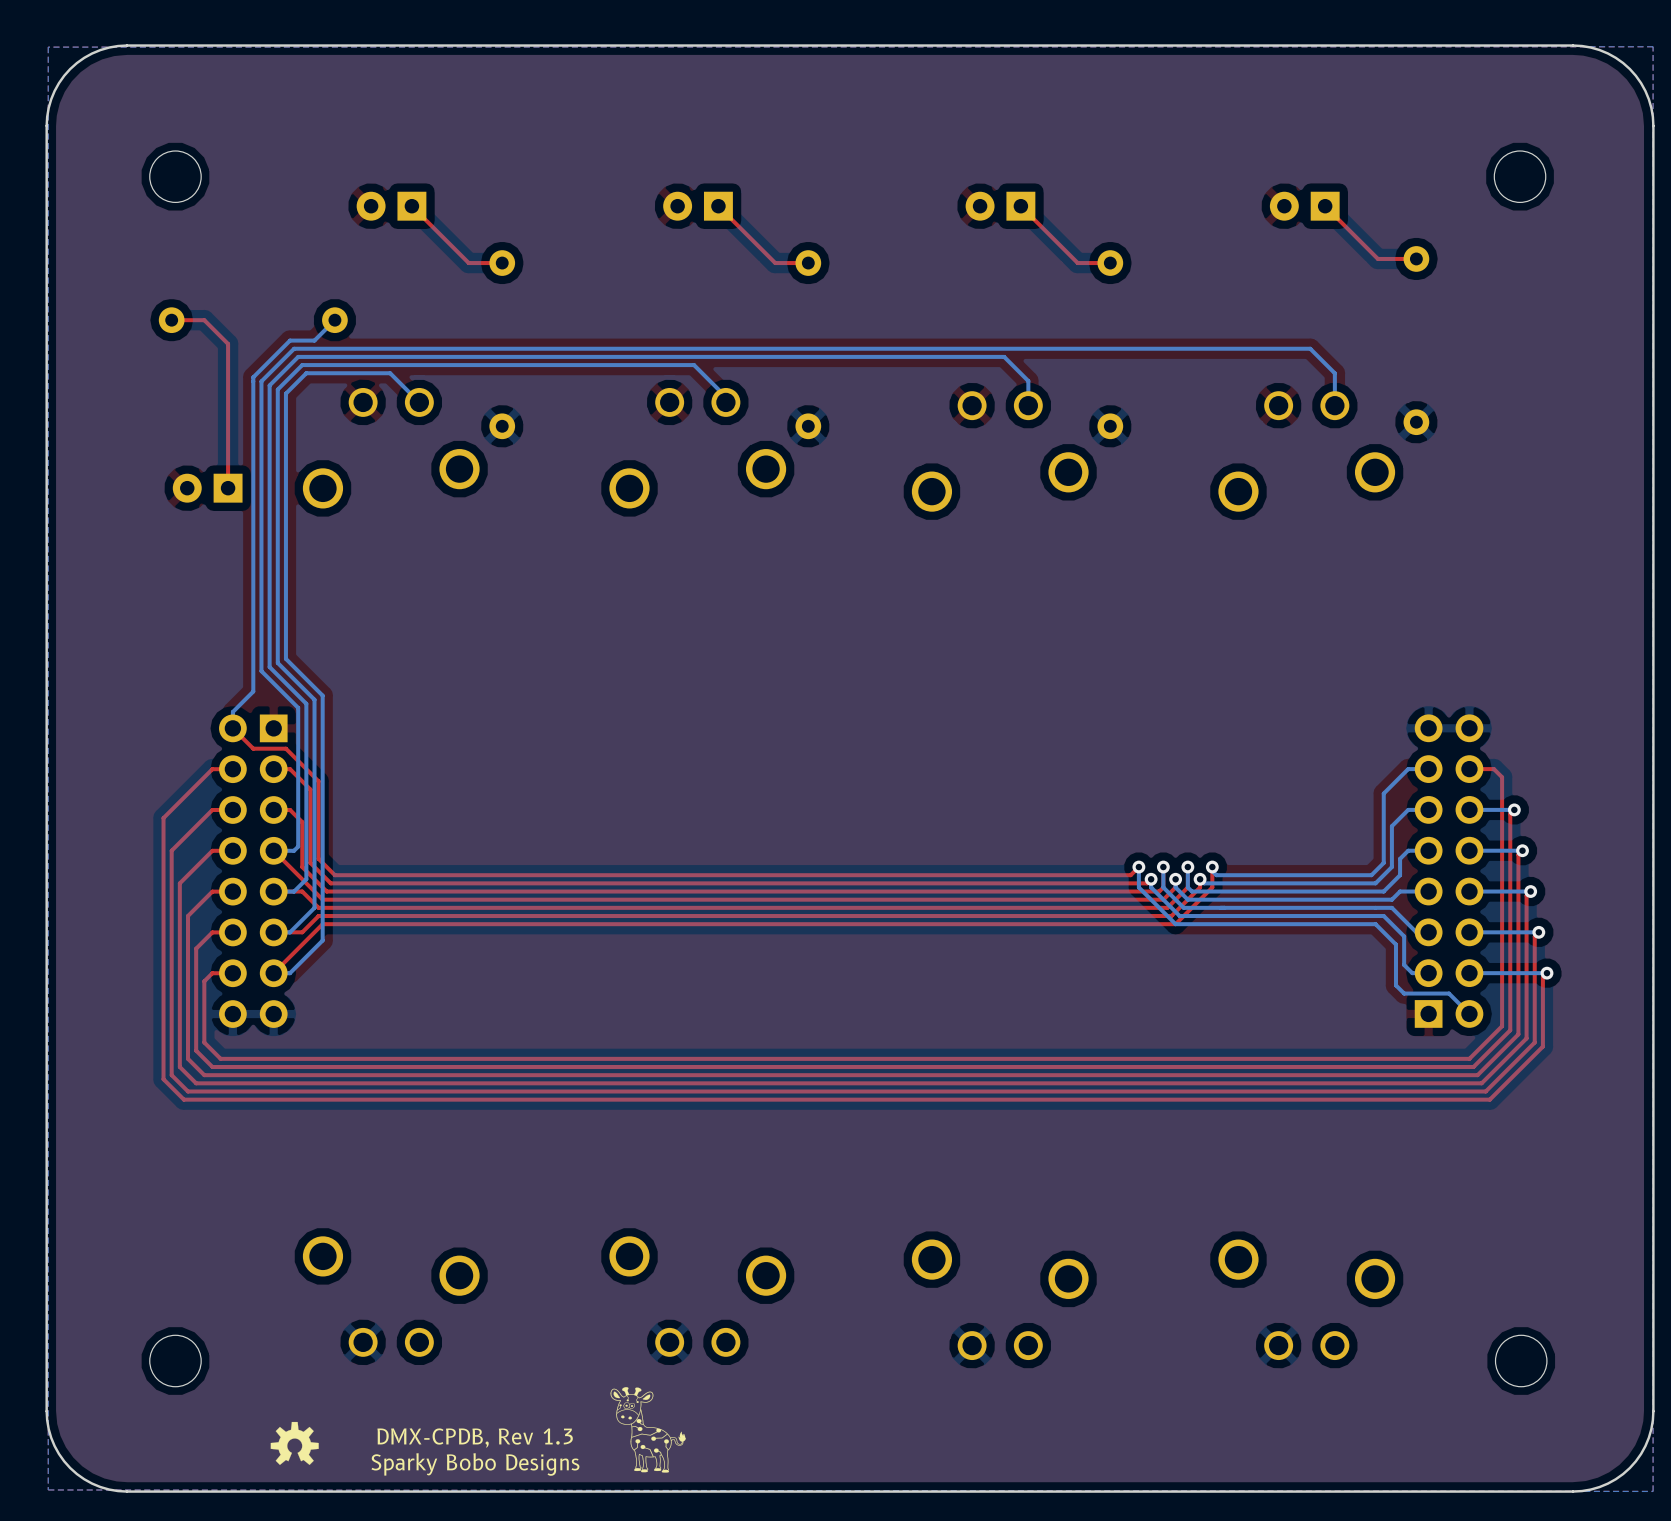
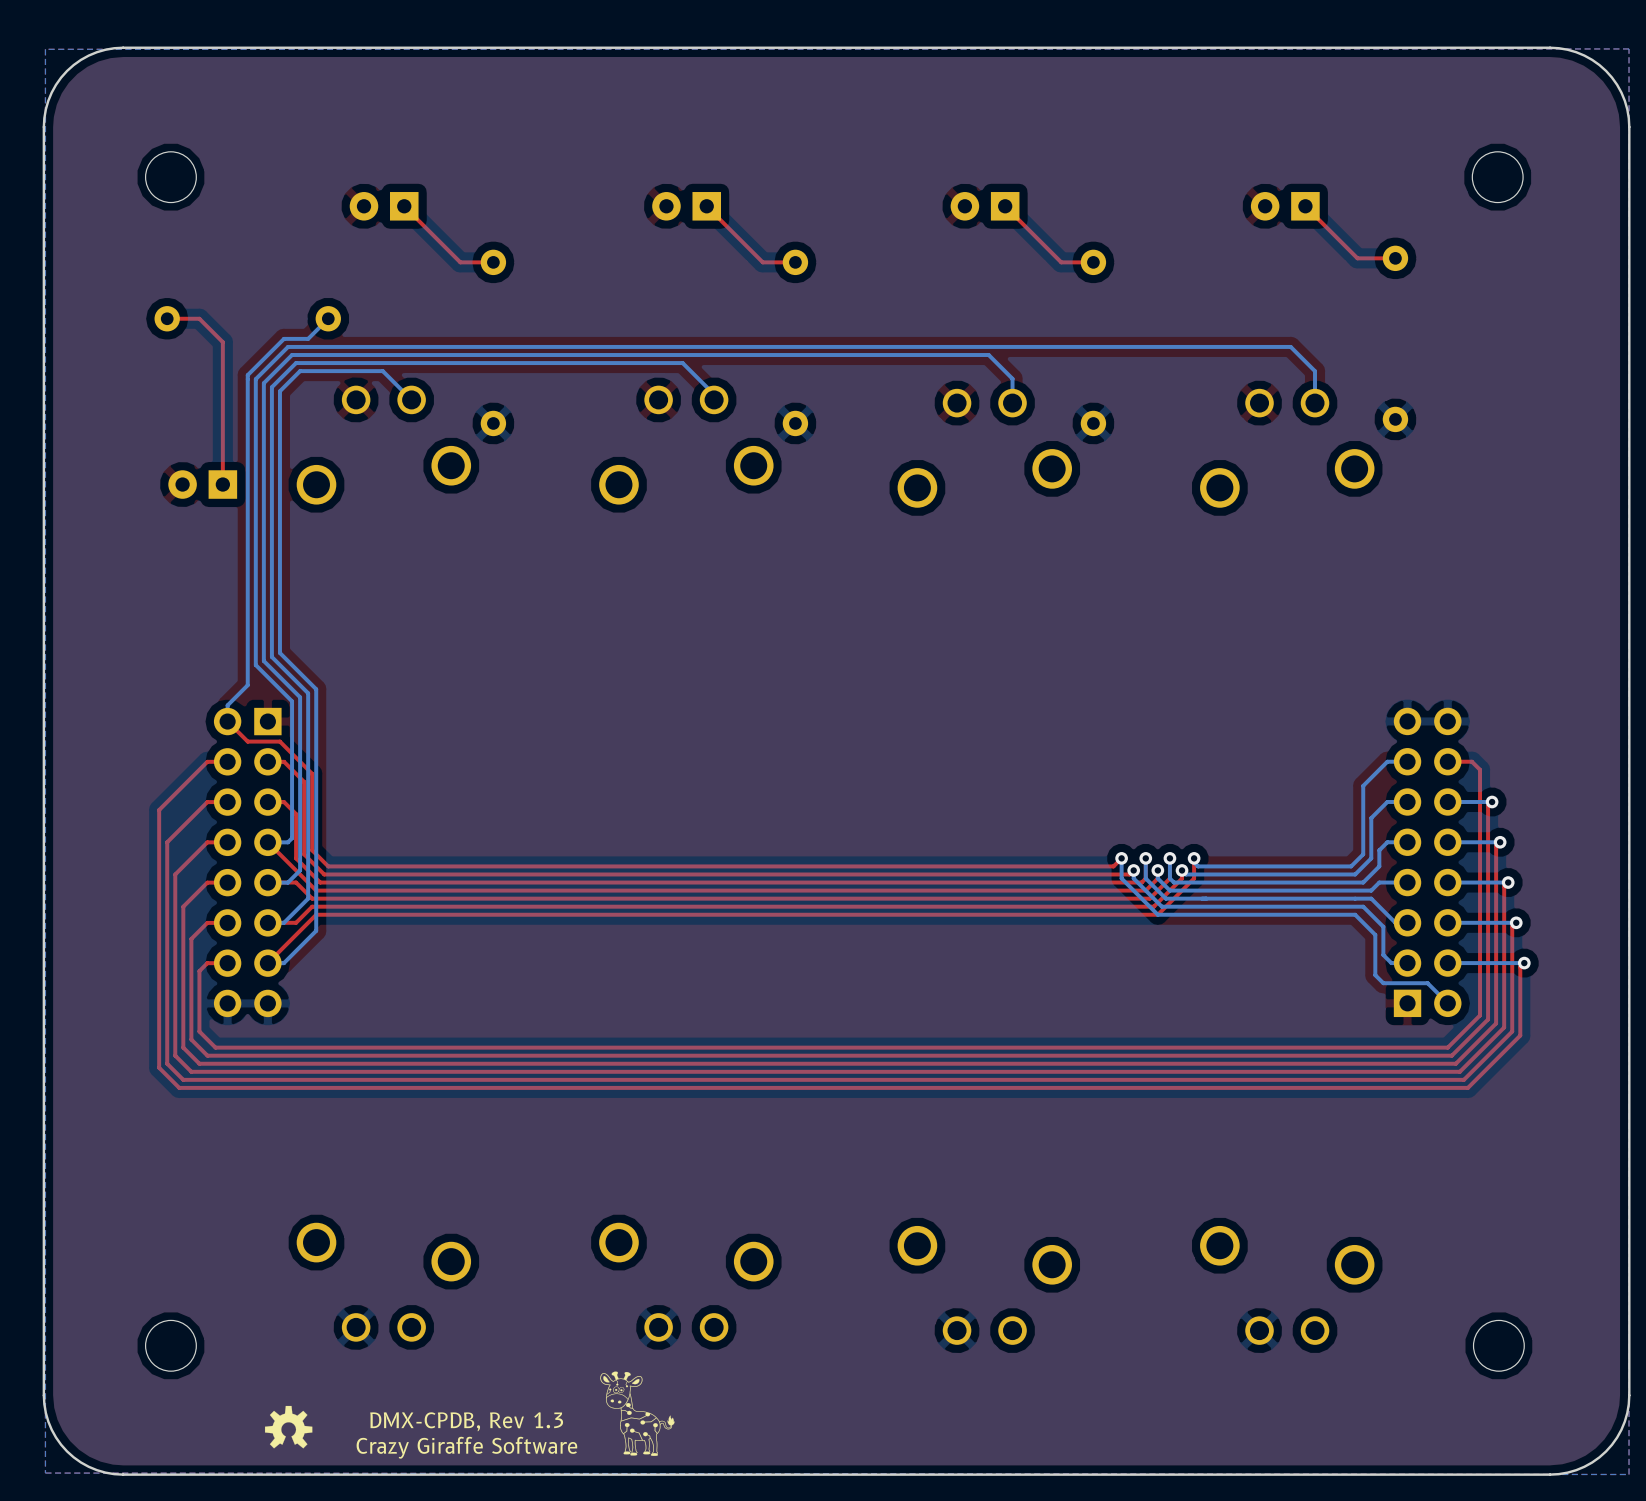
text: Sparky Bobo Designs (475, 1464) -> Crazy Giraffe Software (466, 1447)

